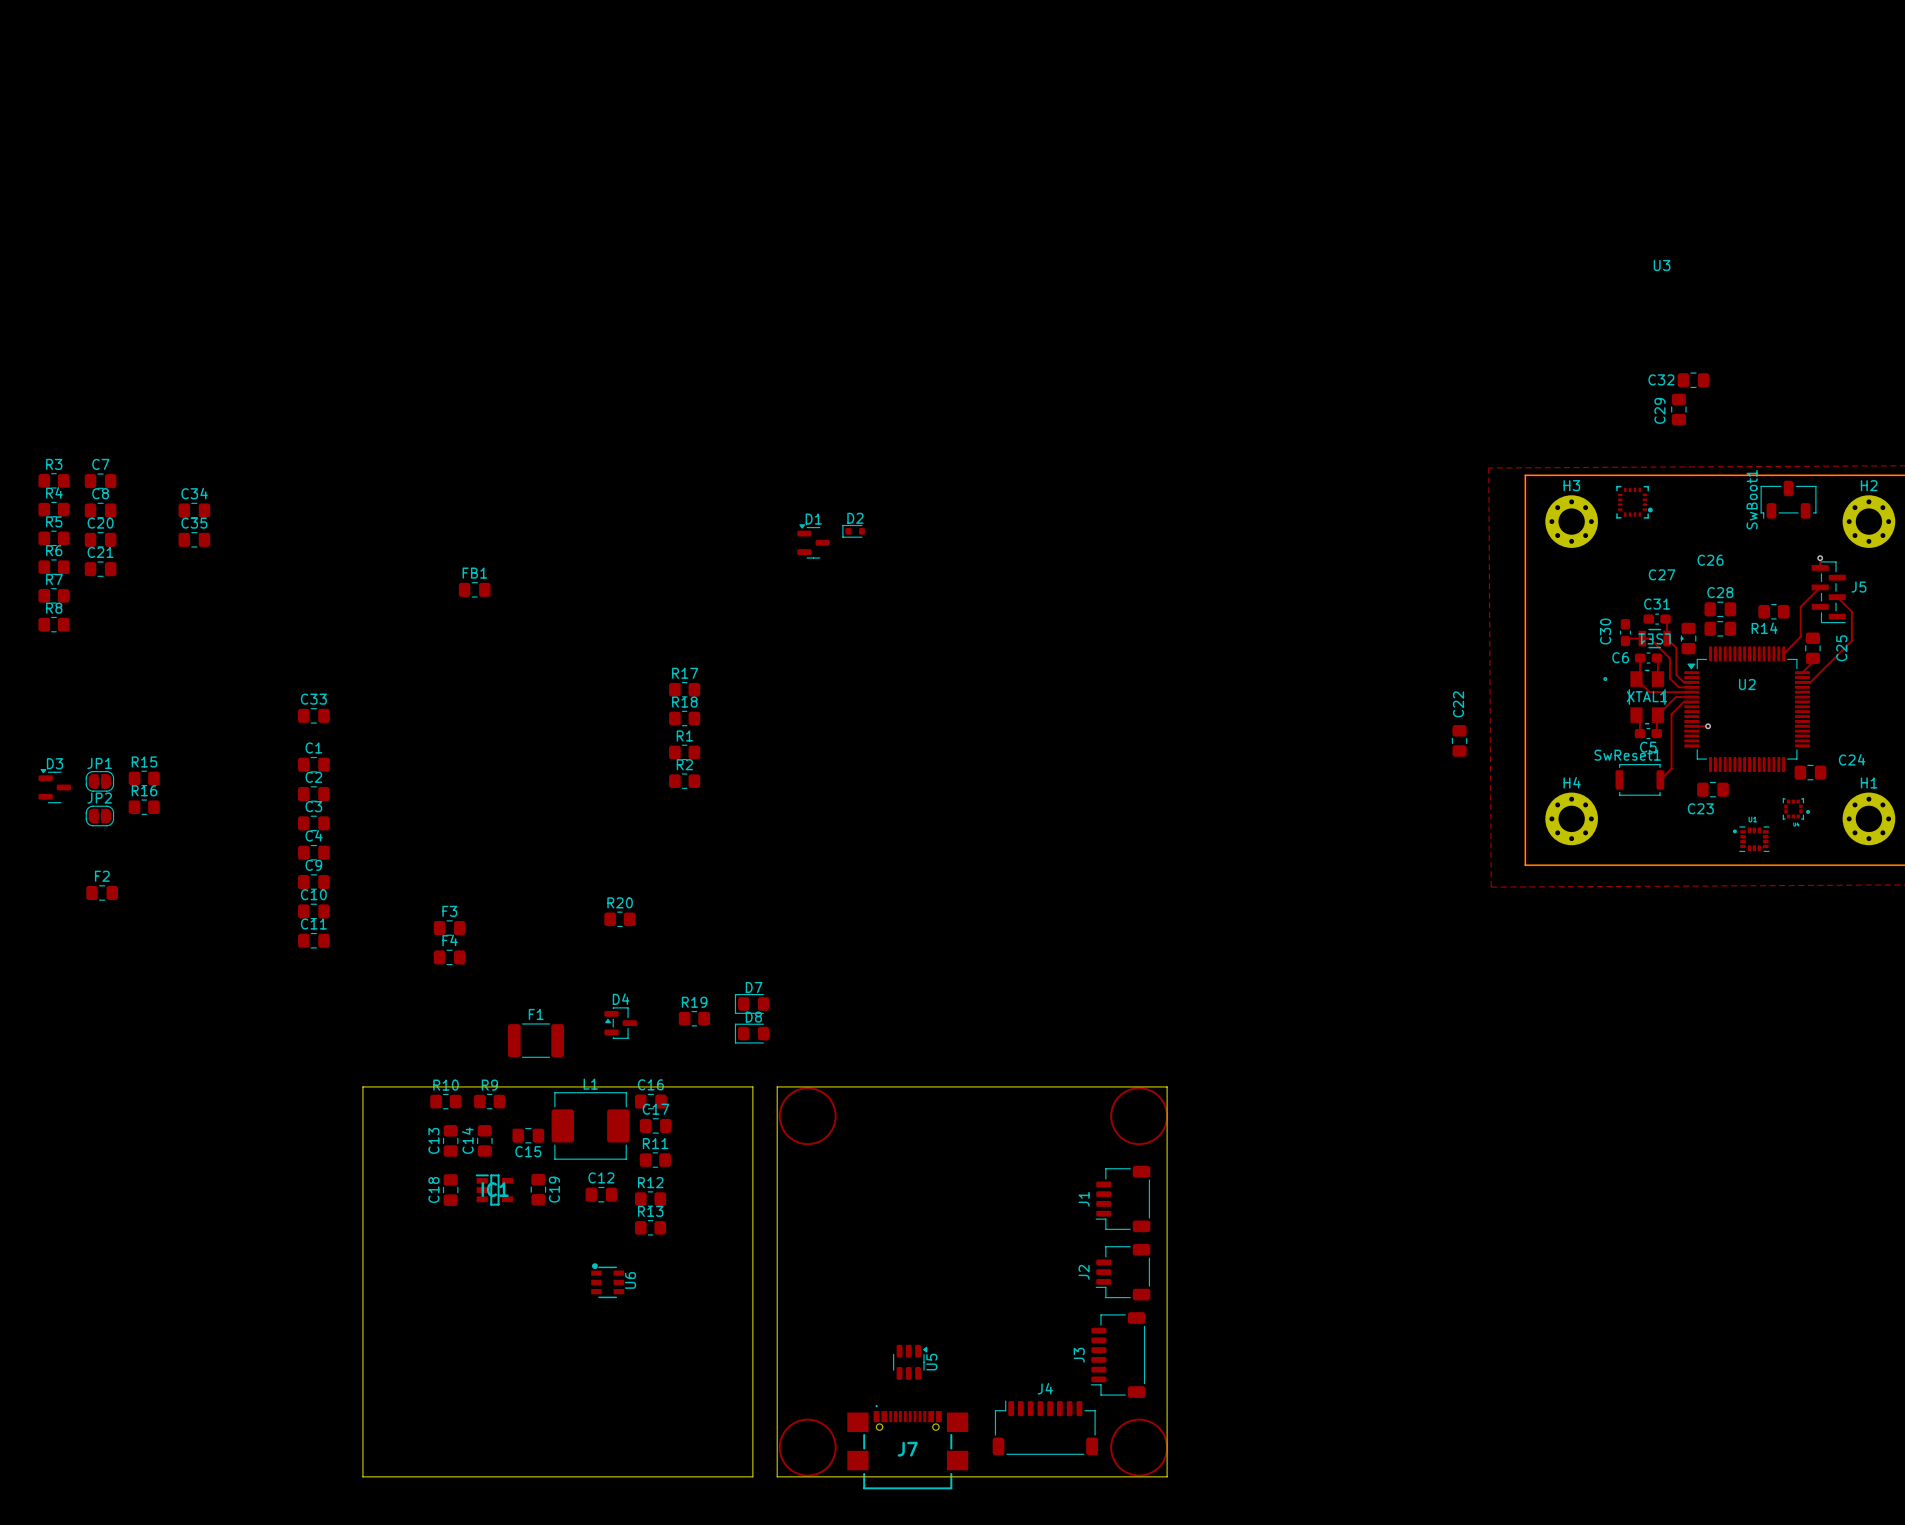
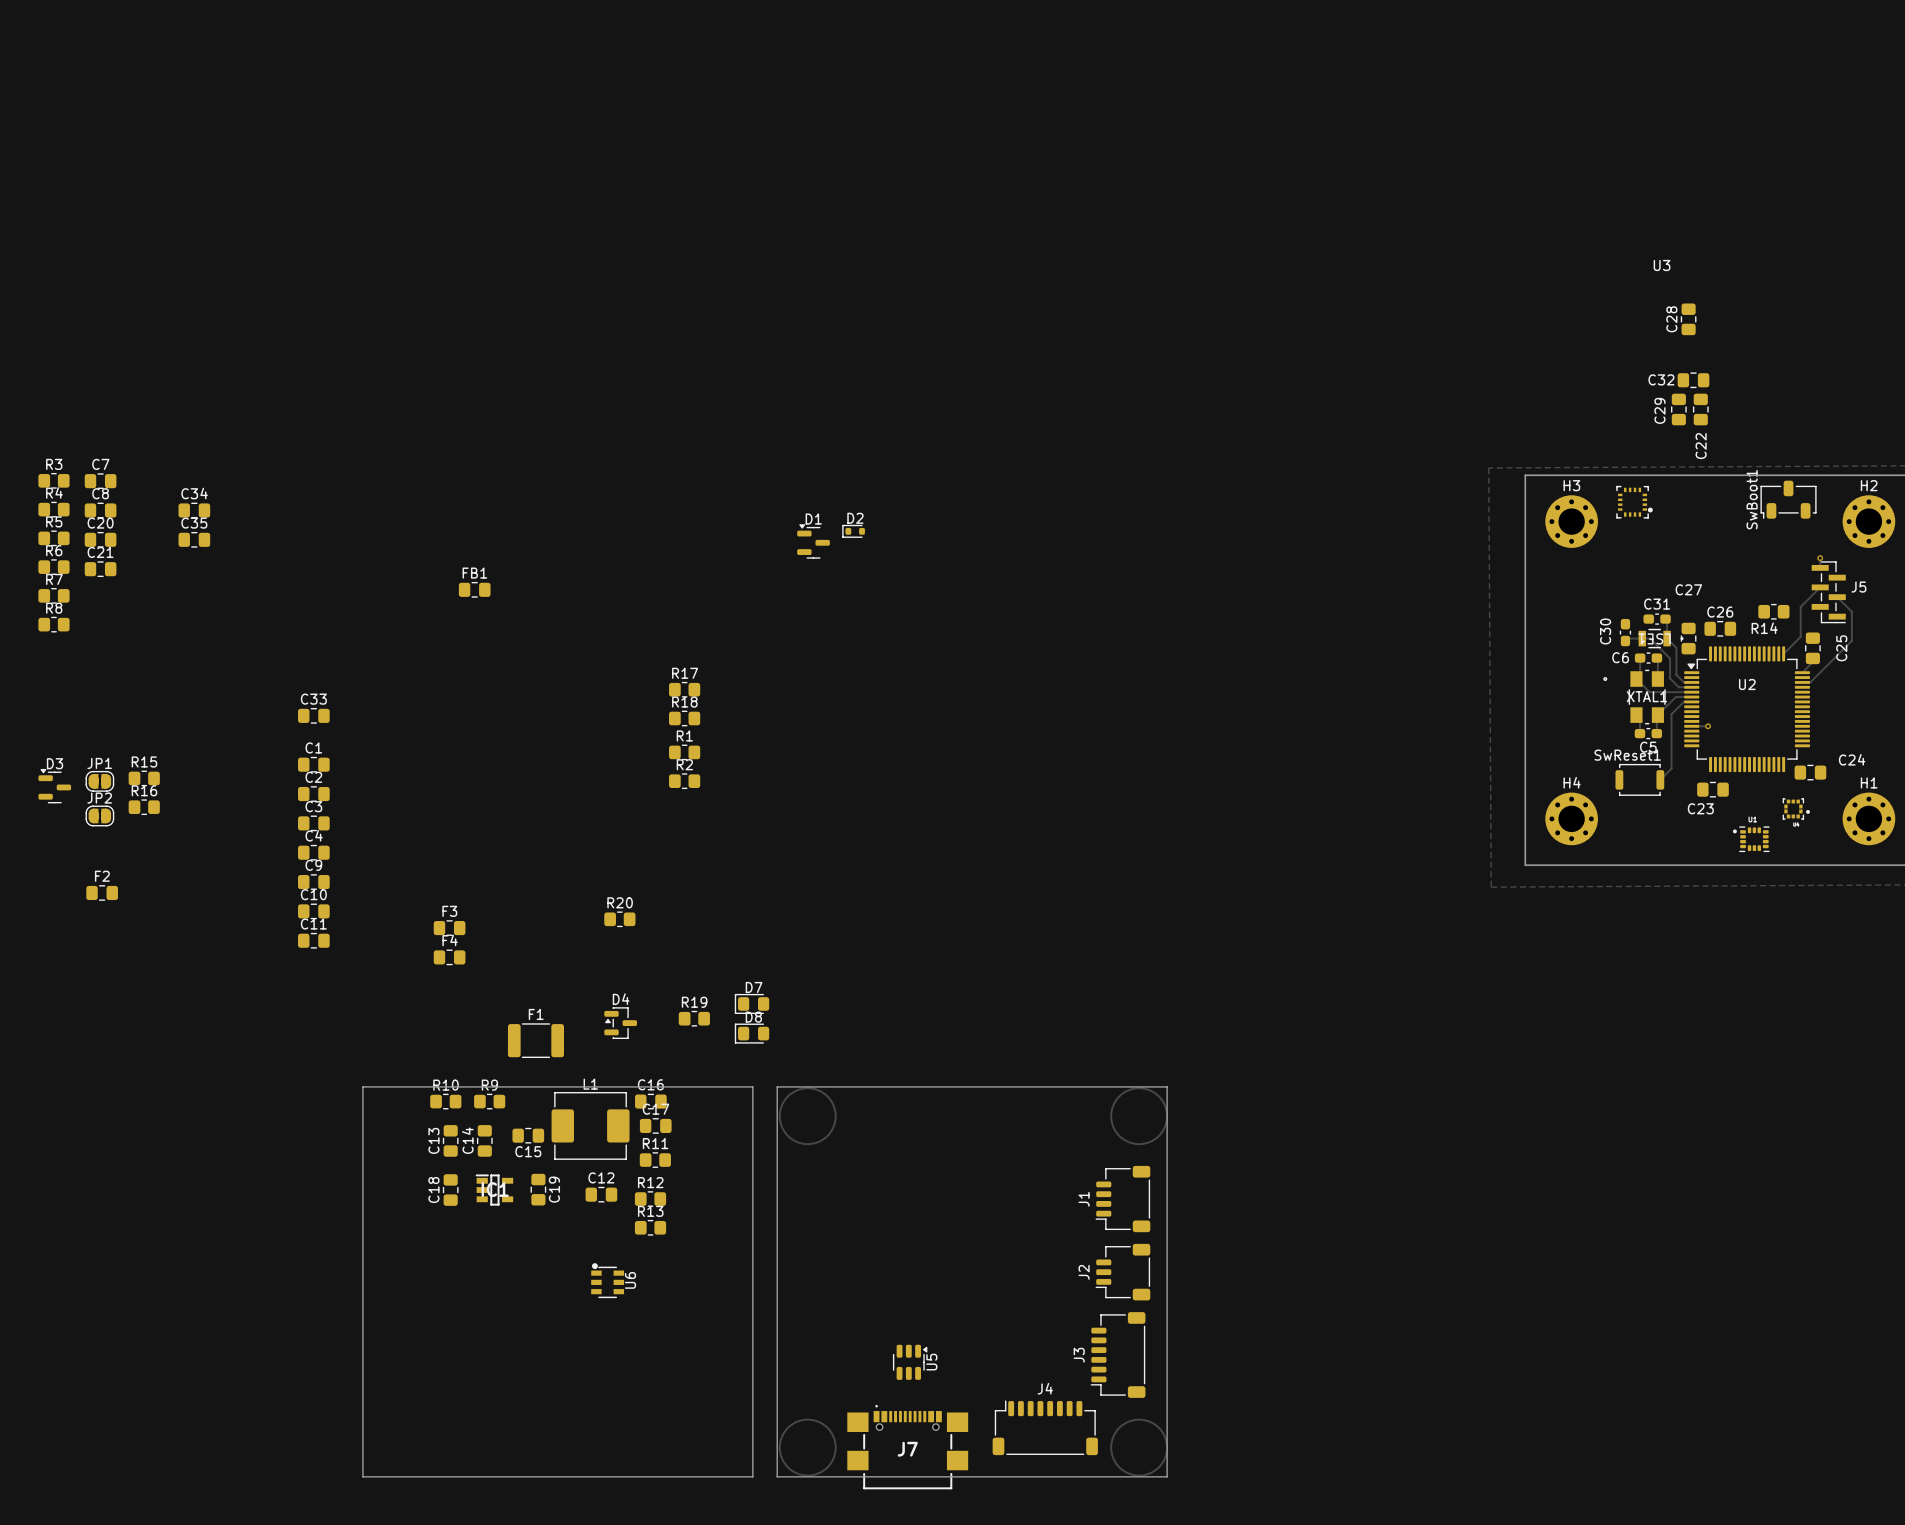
C26 name position: C26 (1710, 560) -> C26 (1720, 612)
C27 name position: C27 (1662, 574) -> C27 (1688, 589)
C28 name position: C28 (1720, 592) -> C28 (1671, 319)
C28 rotation: 0° (1720, 609) -> 90° clockwise (1688, 319)
C28 position: (1720, 609) -> (1688, 319)
C22 name position: C22 (1458, 704) -> C22 (1701, 446)
C22 position: (1459, 740) -> (1700, 409)

